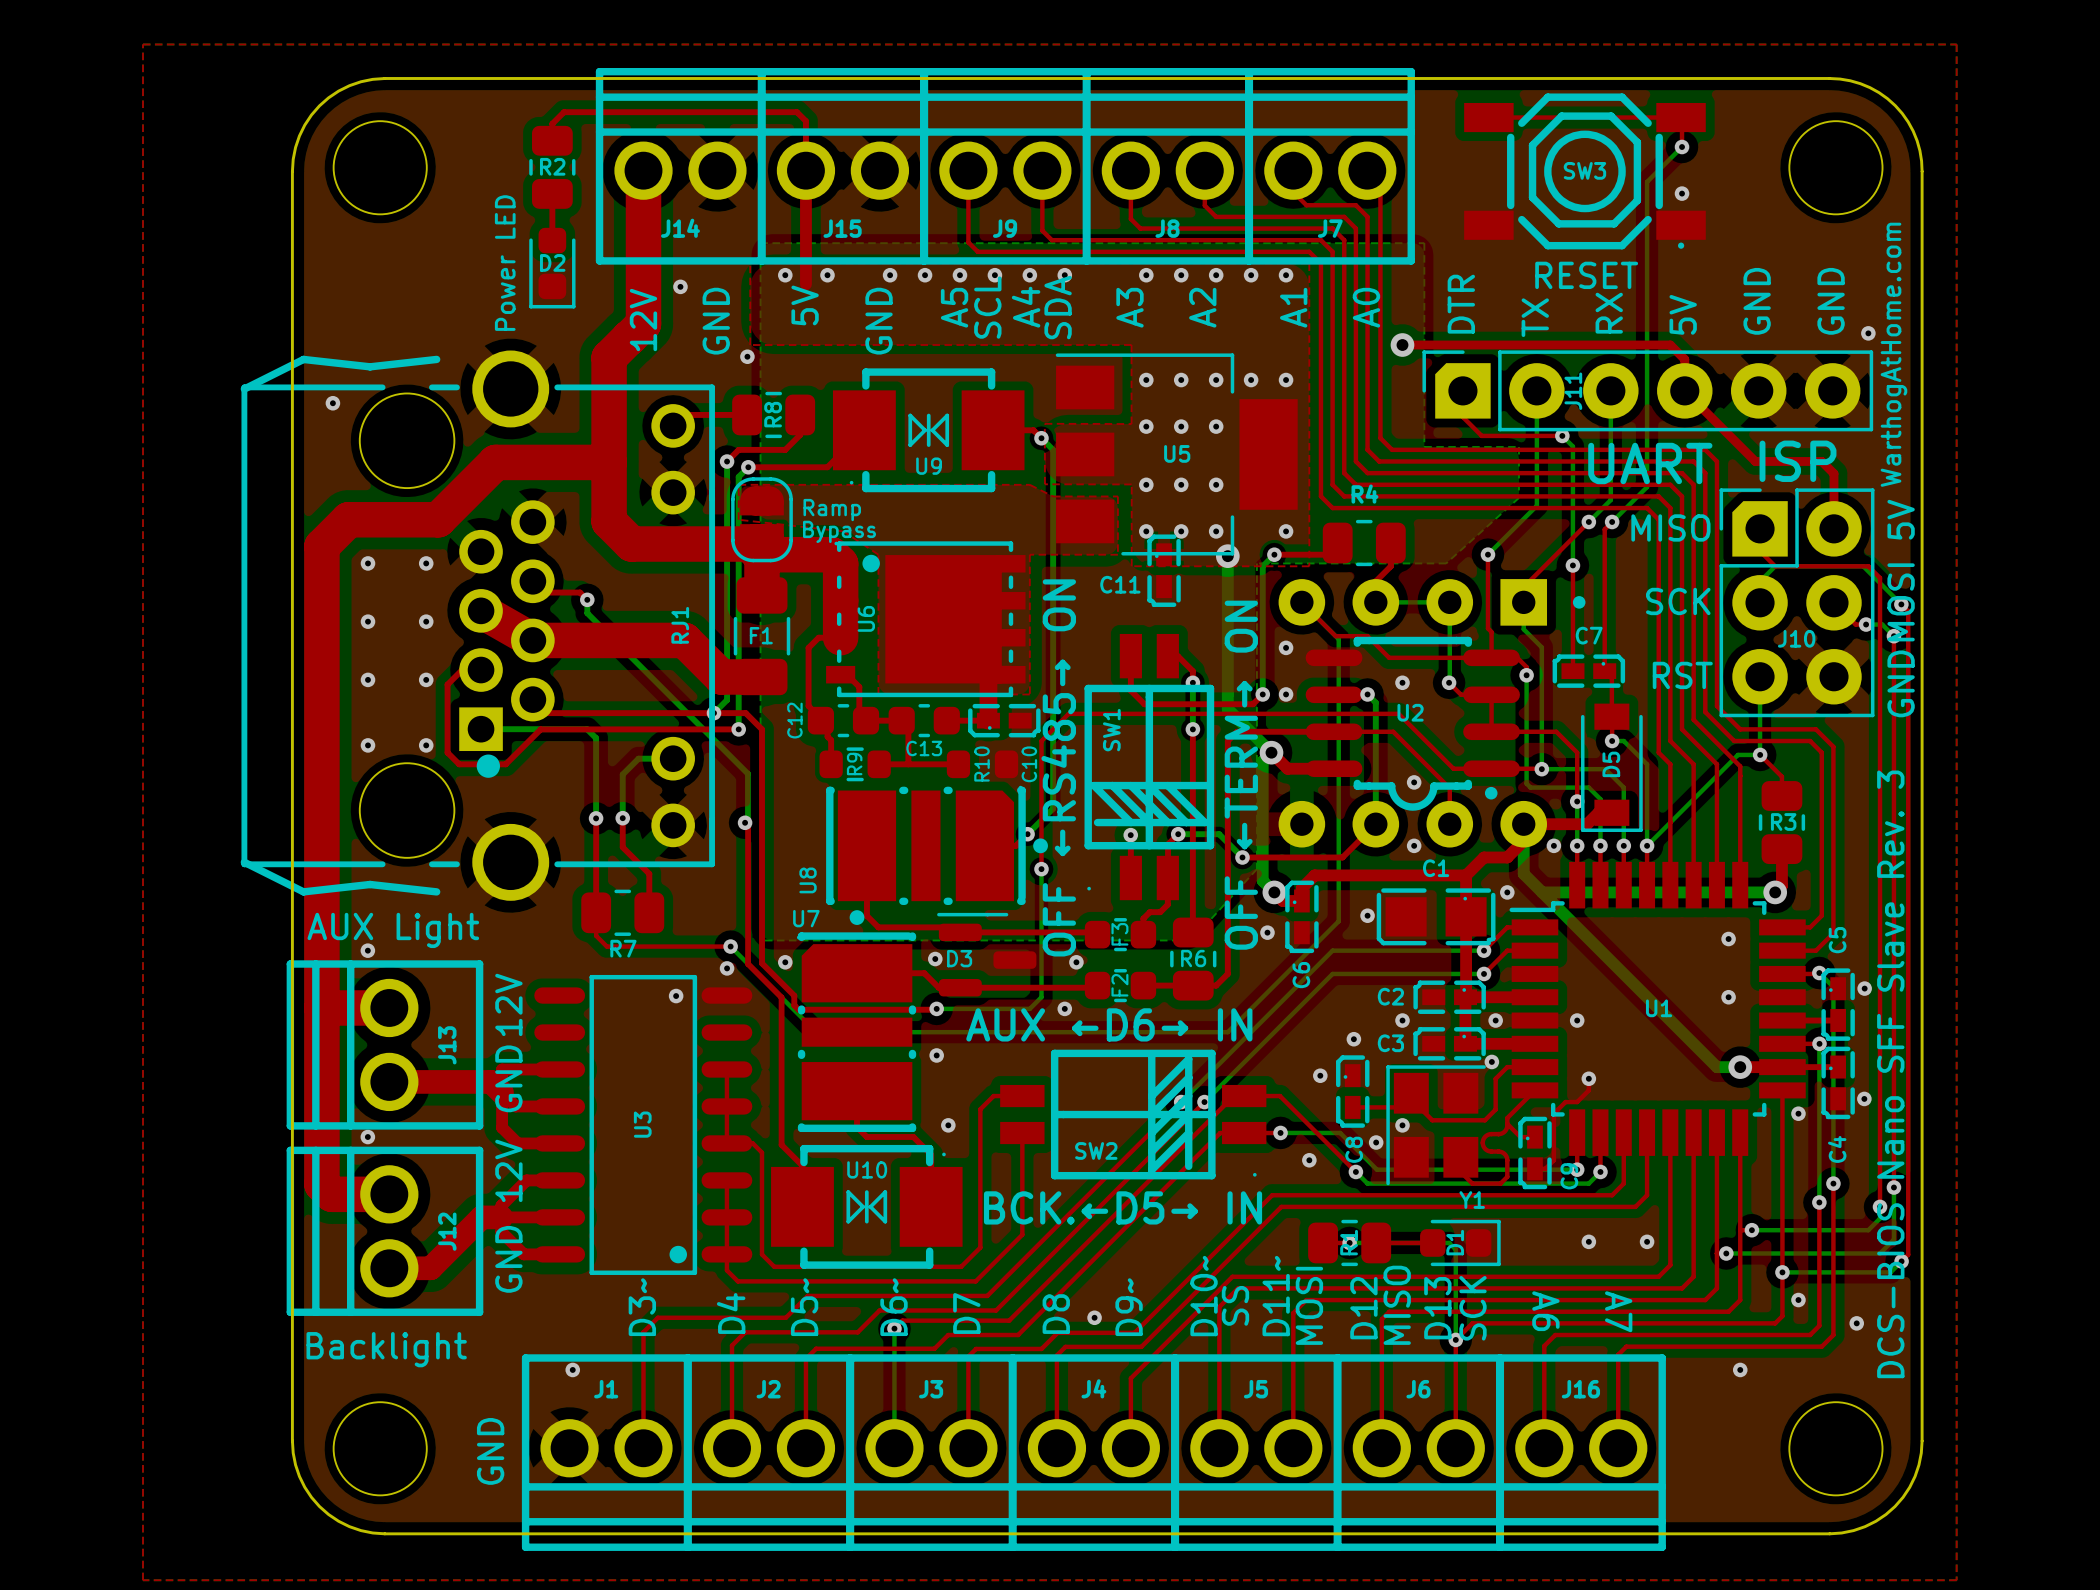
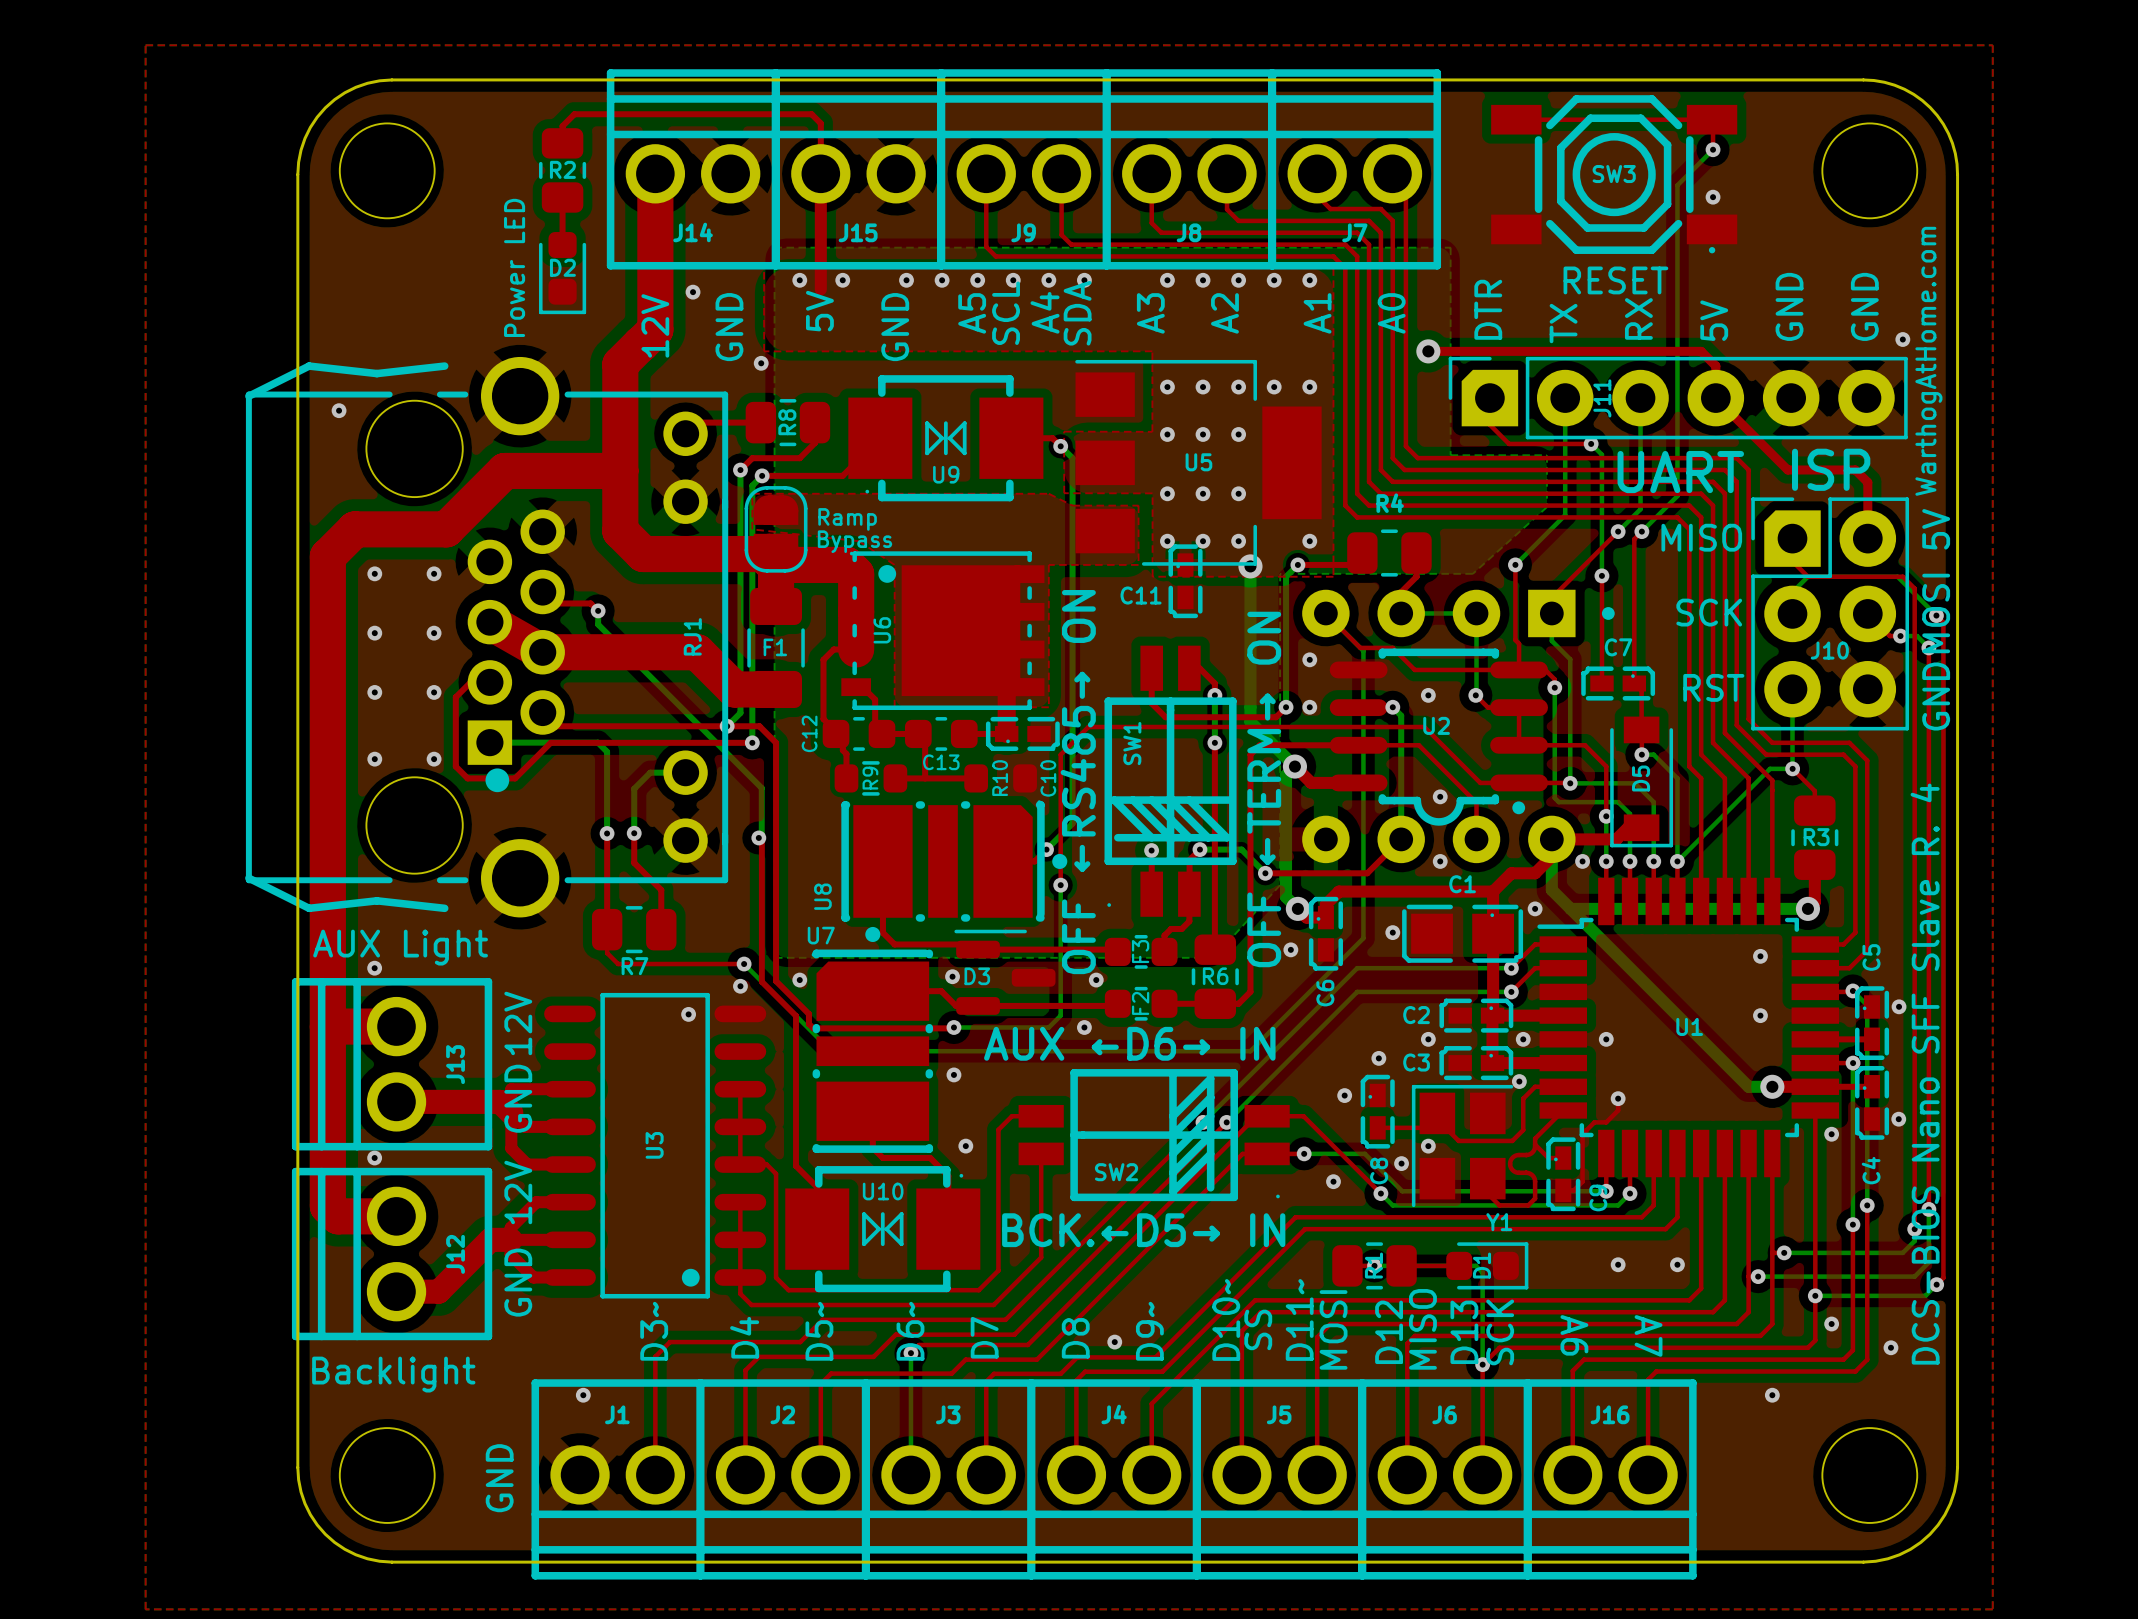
text: DCS-BIOS Nano SFF Slave Rev. 3 (1890, 1074) -> DCS-BIOS Nano SFF Slave R. 4 (1925, 1074)

